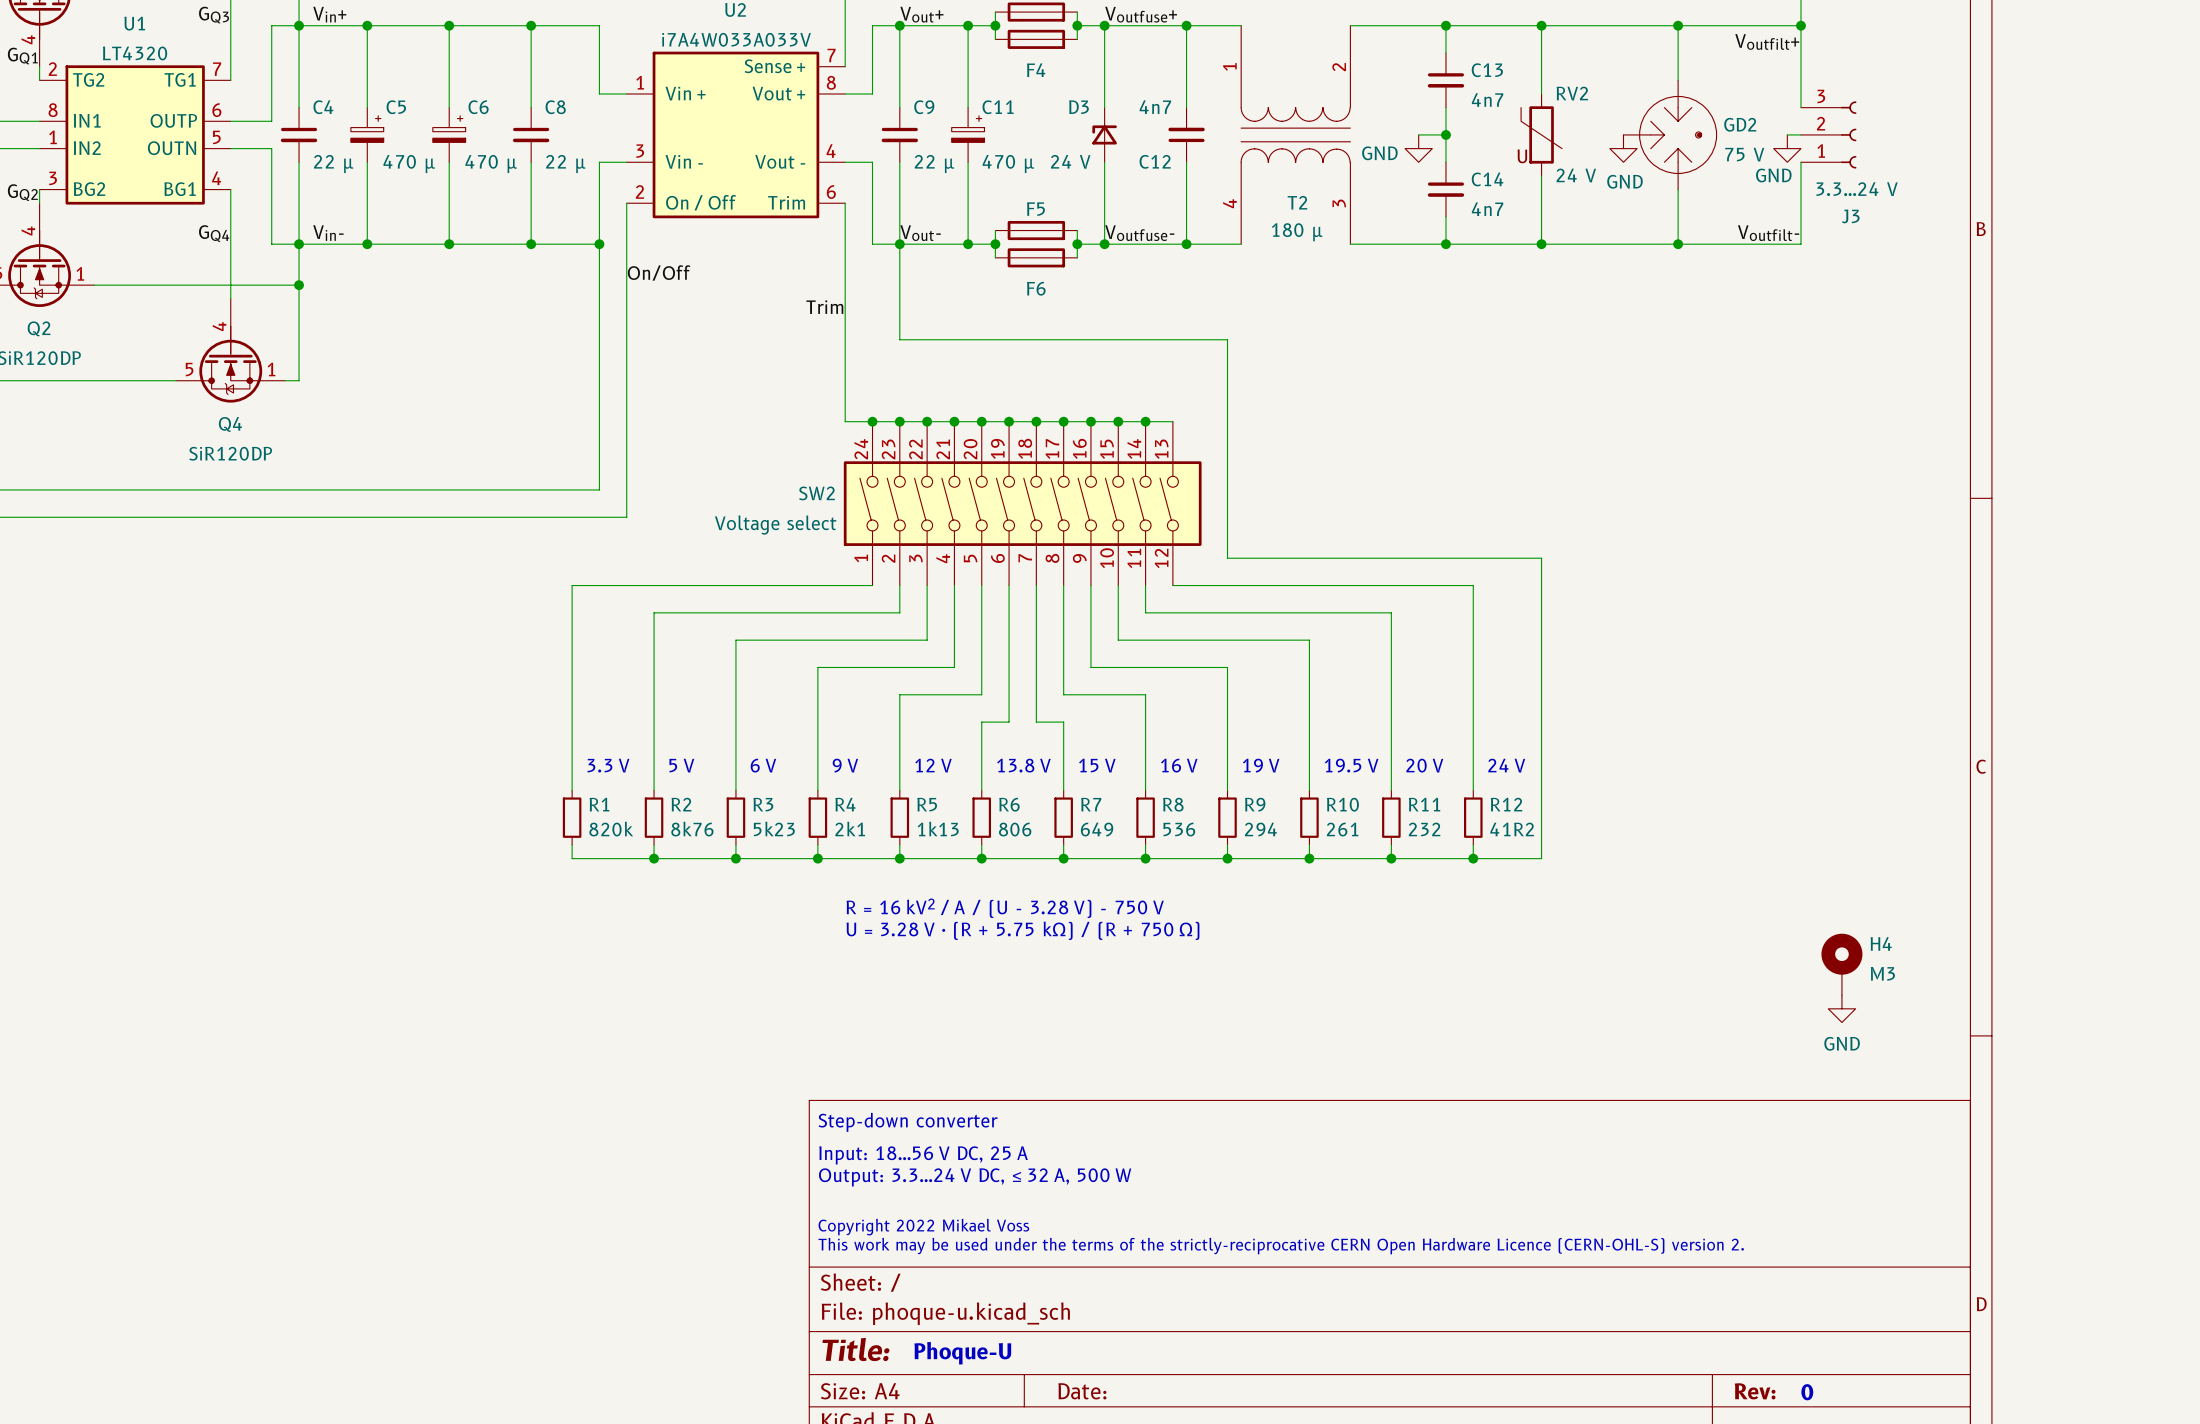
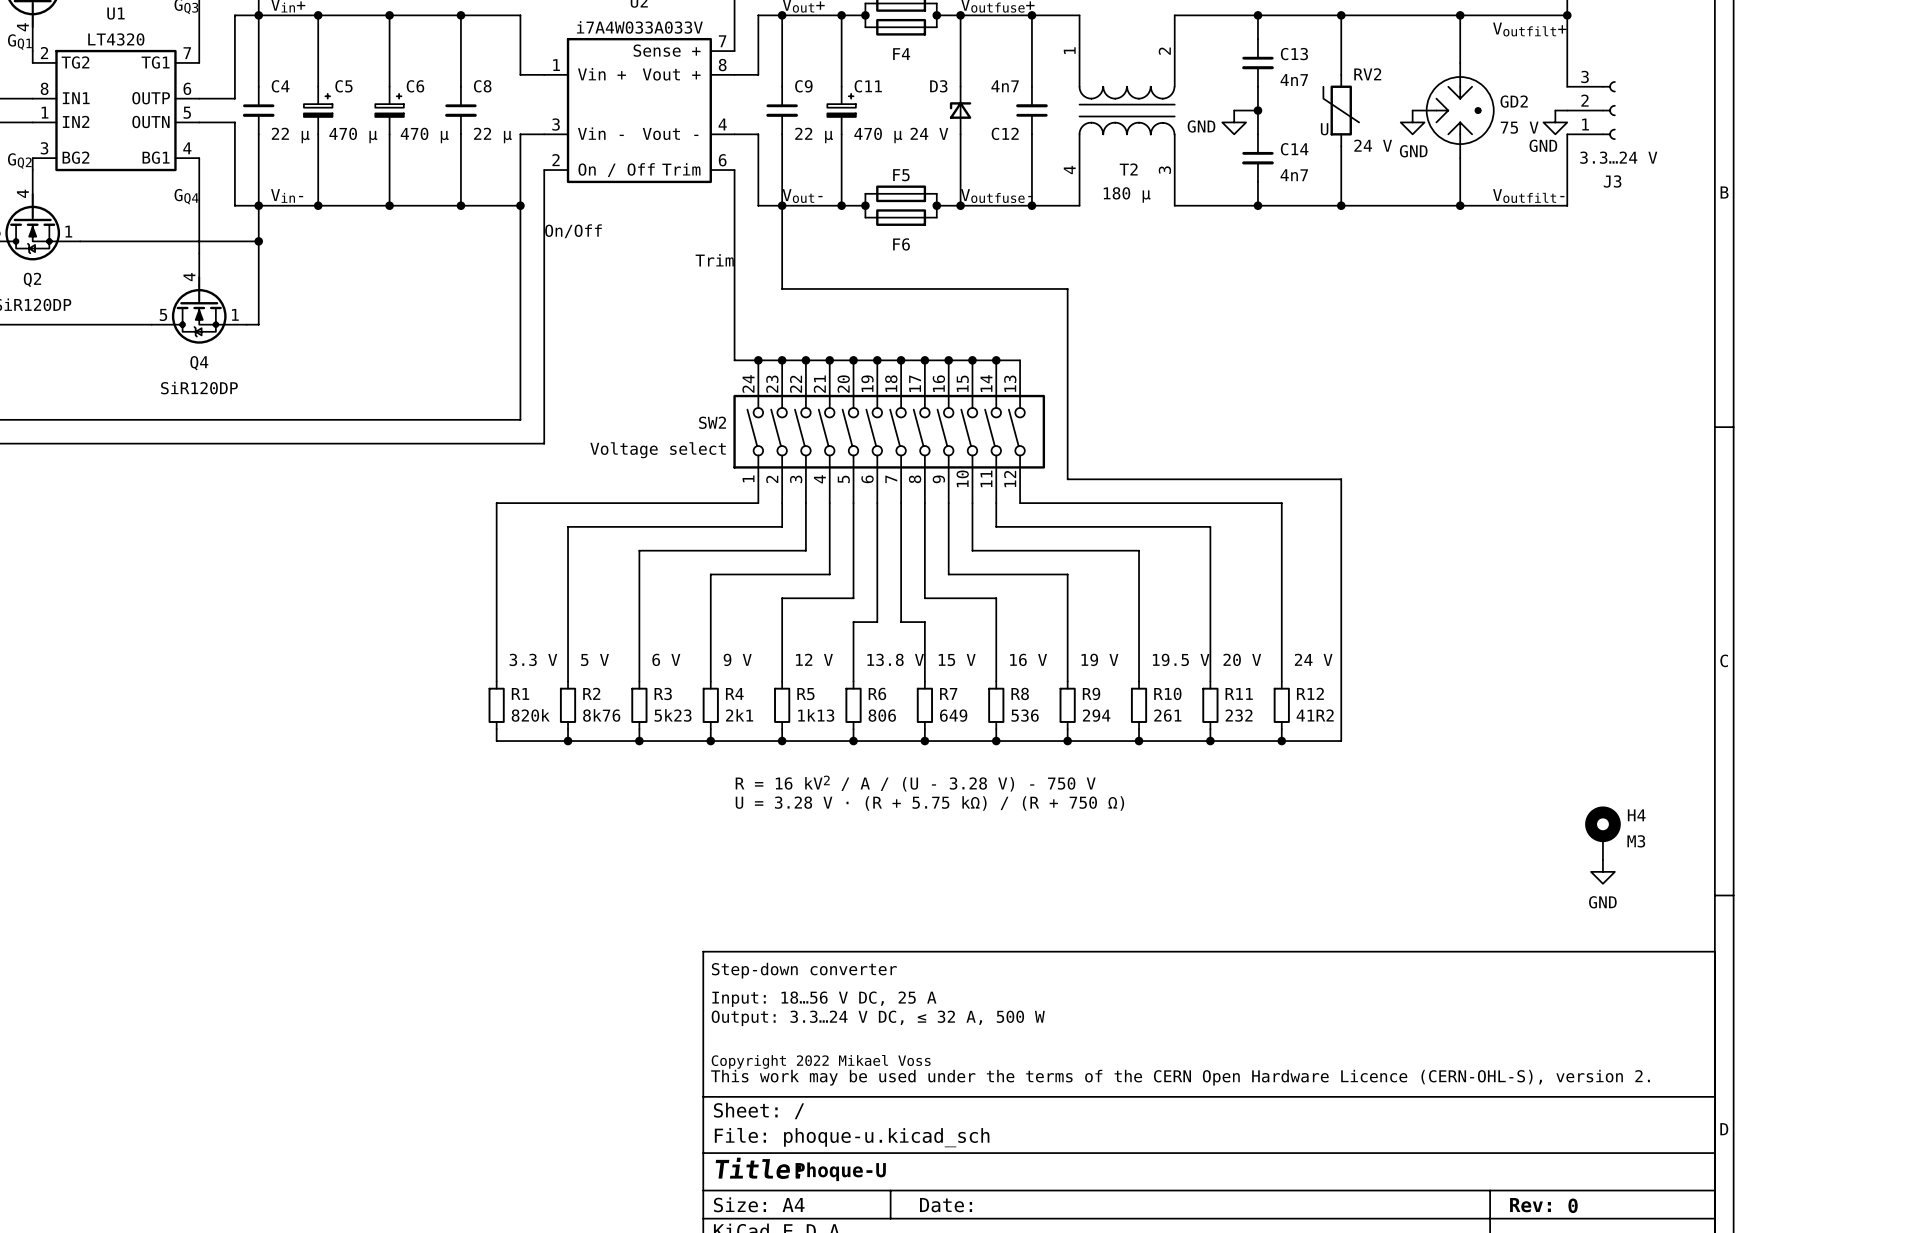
text: This work may be used under the terms of the strictly‐reciprocative CERN Open Hardware Licence (CERN-OHL-S) version 2. (1281, 1246) -> This work may be used under the terms of the CERN Open Hardware Licence (CERN-OHL-S), version 2. (1180, 1077)

